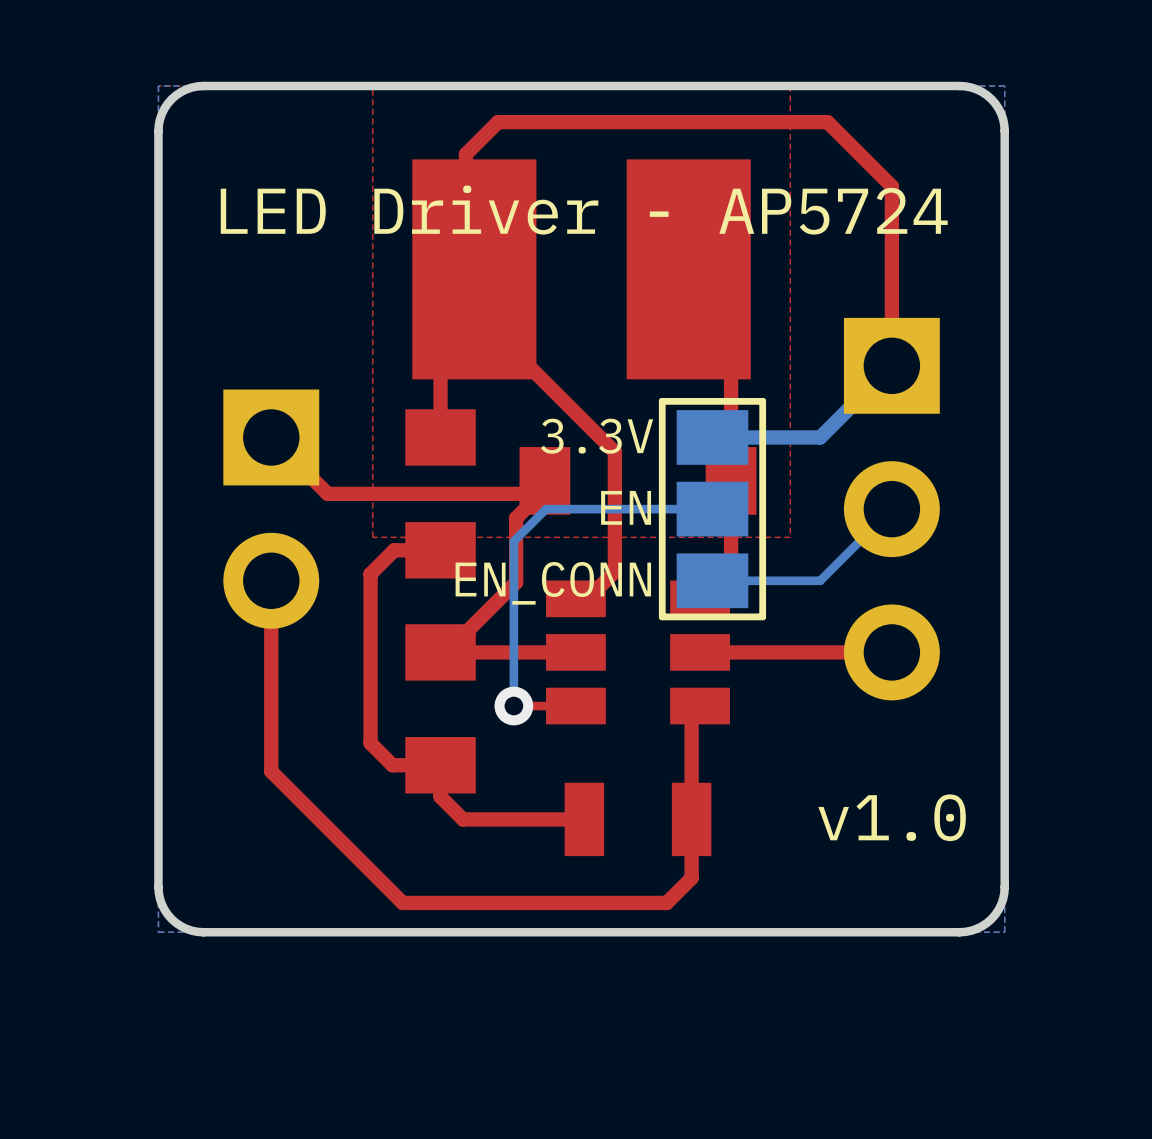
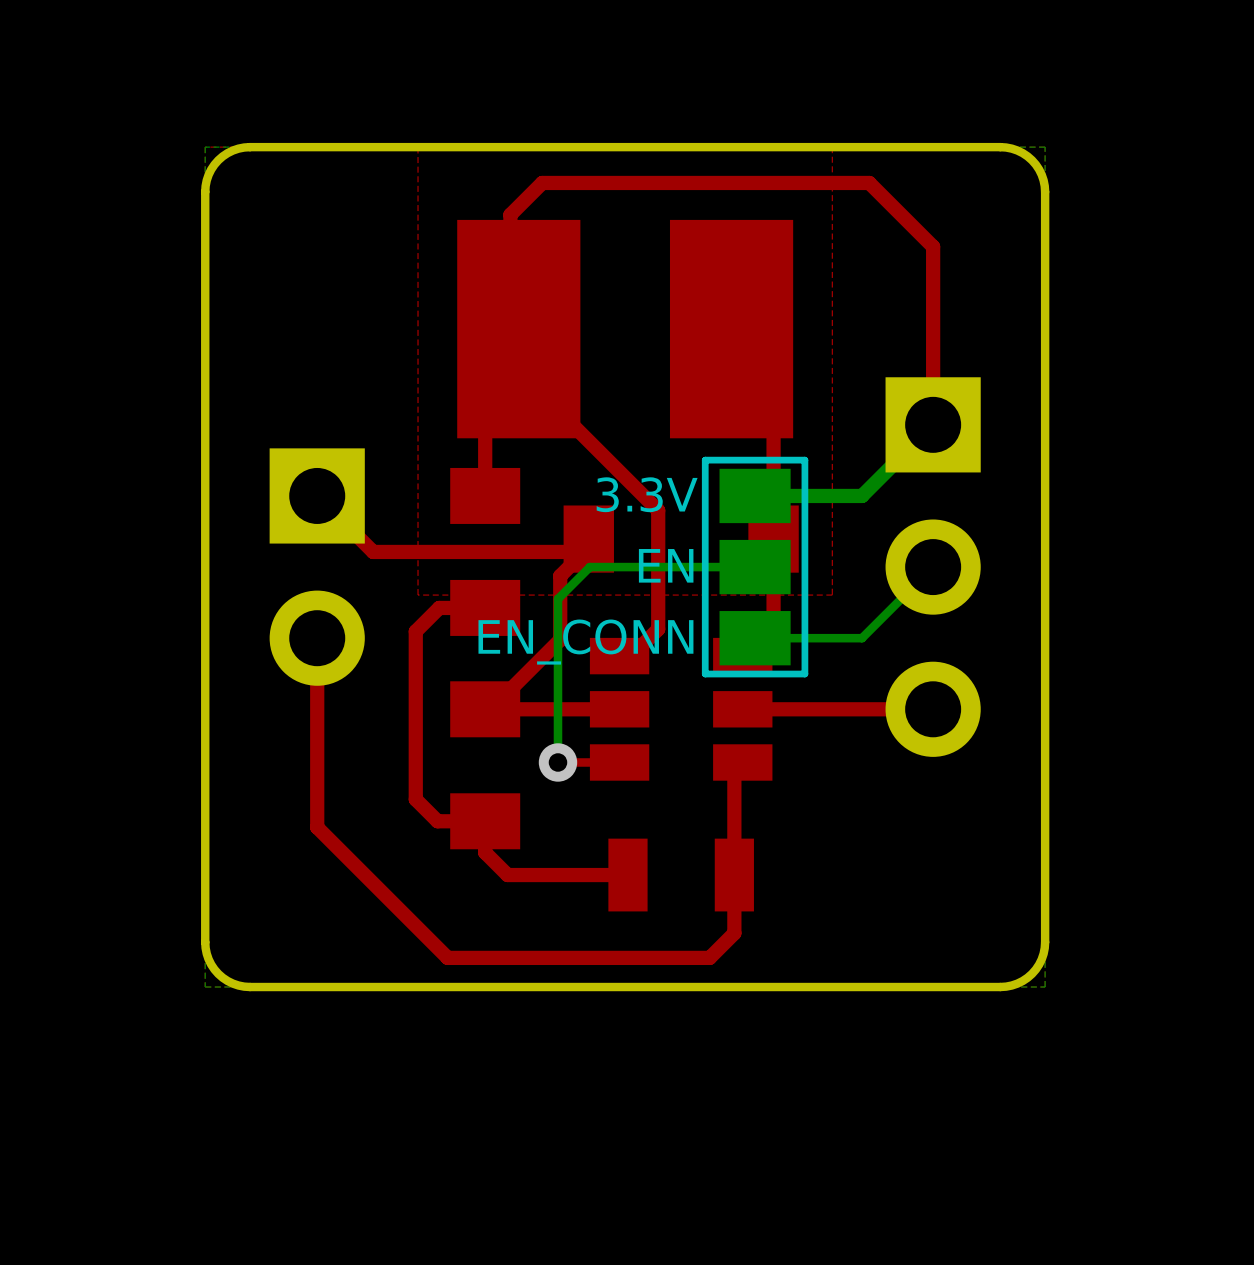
text: LED Driver - AP5724 (584, 210) -> none
text: v1.0 (892, 817) -> none

